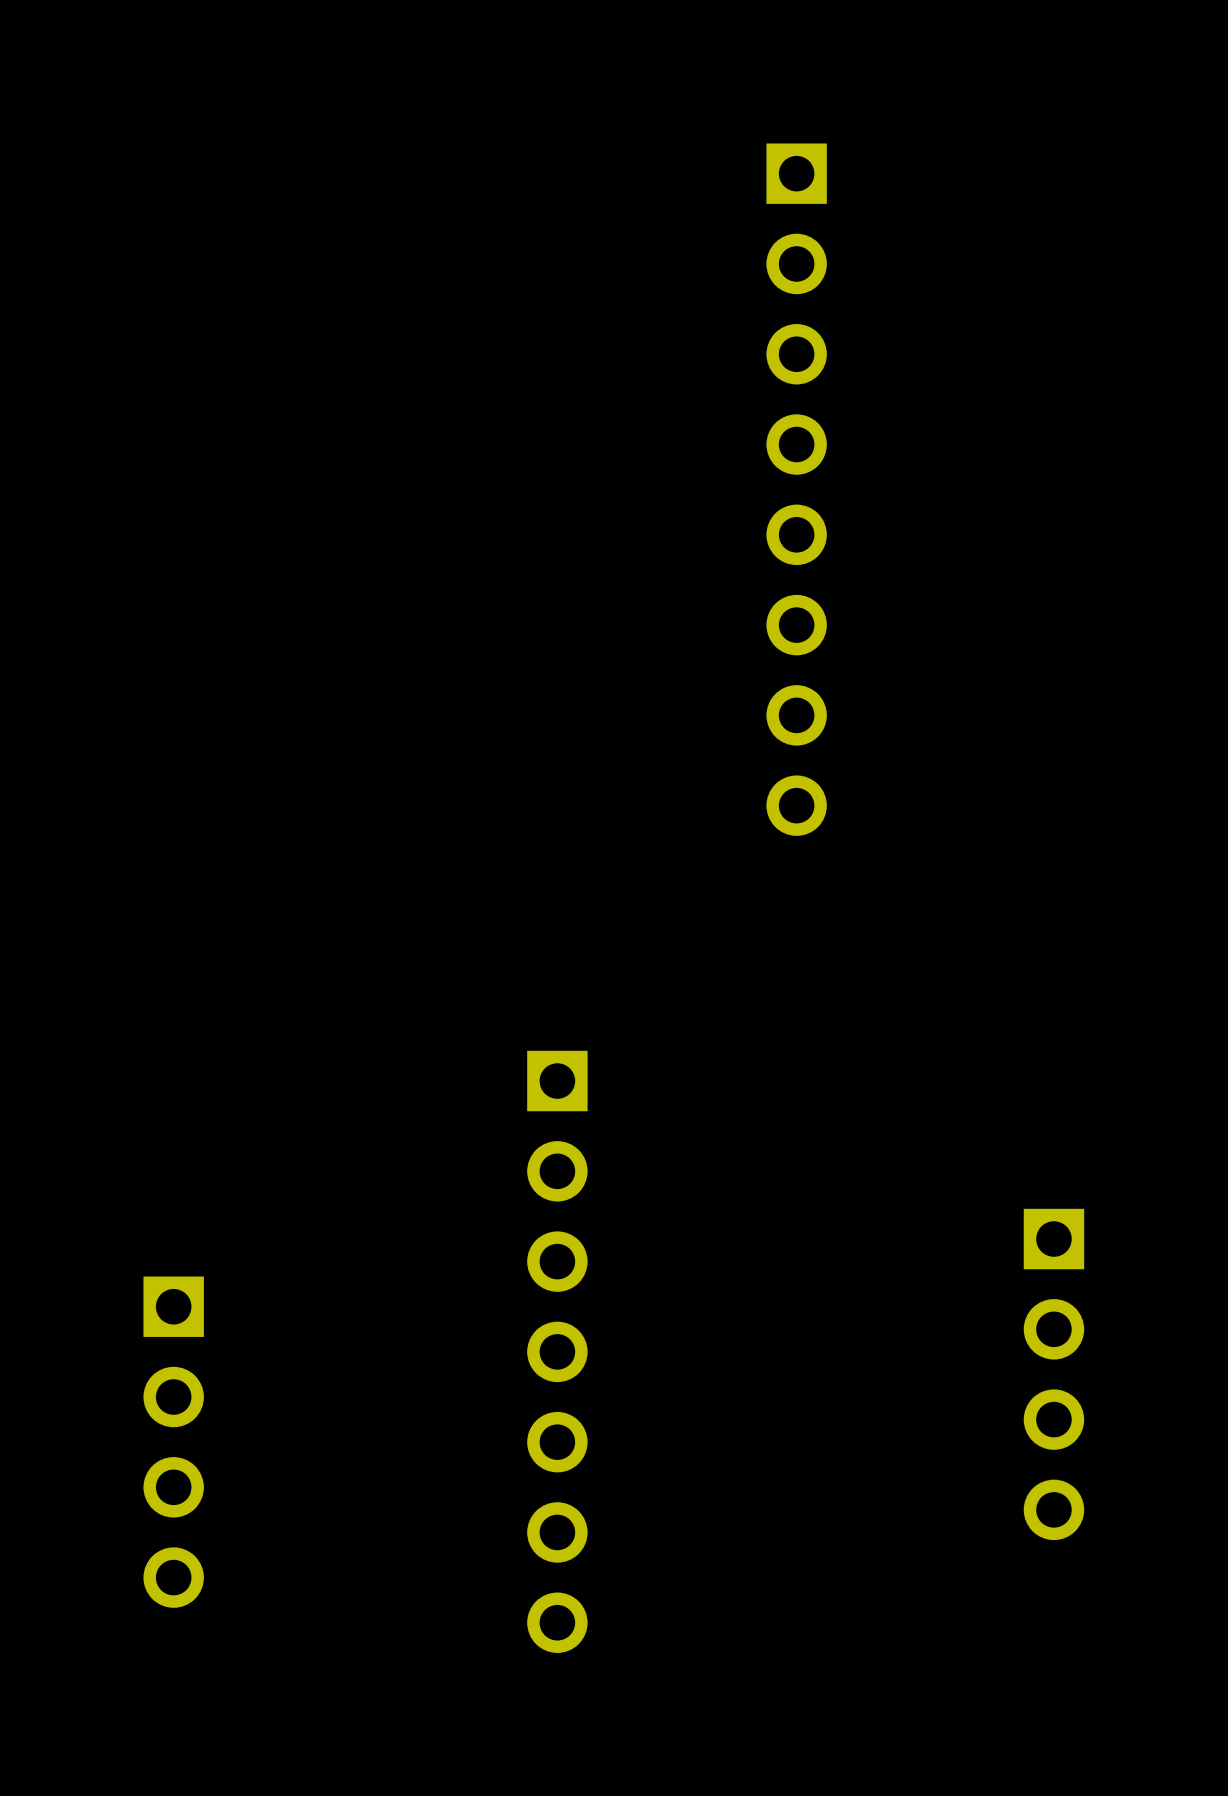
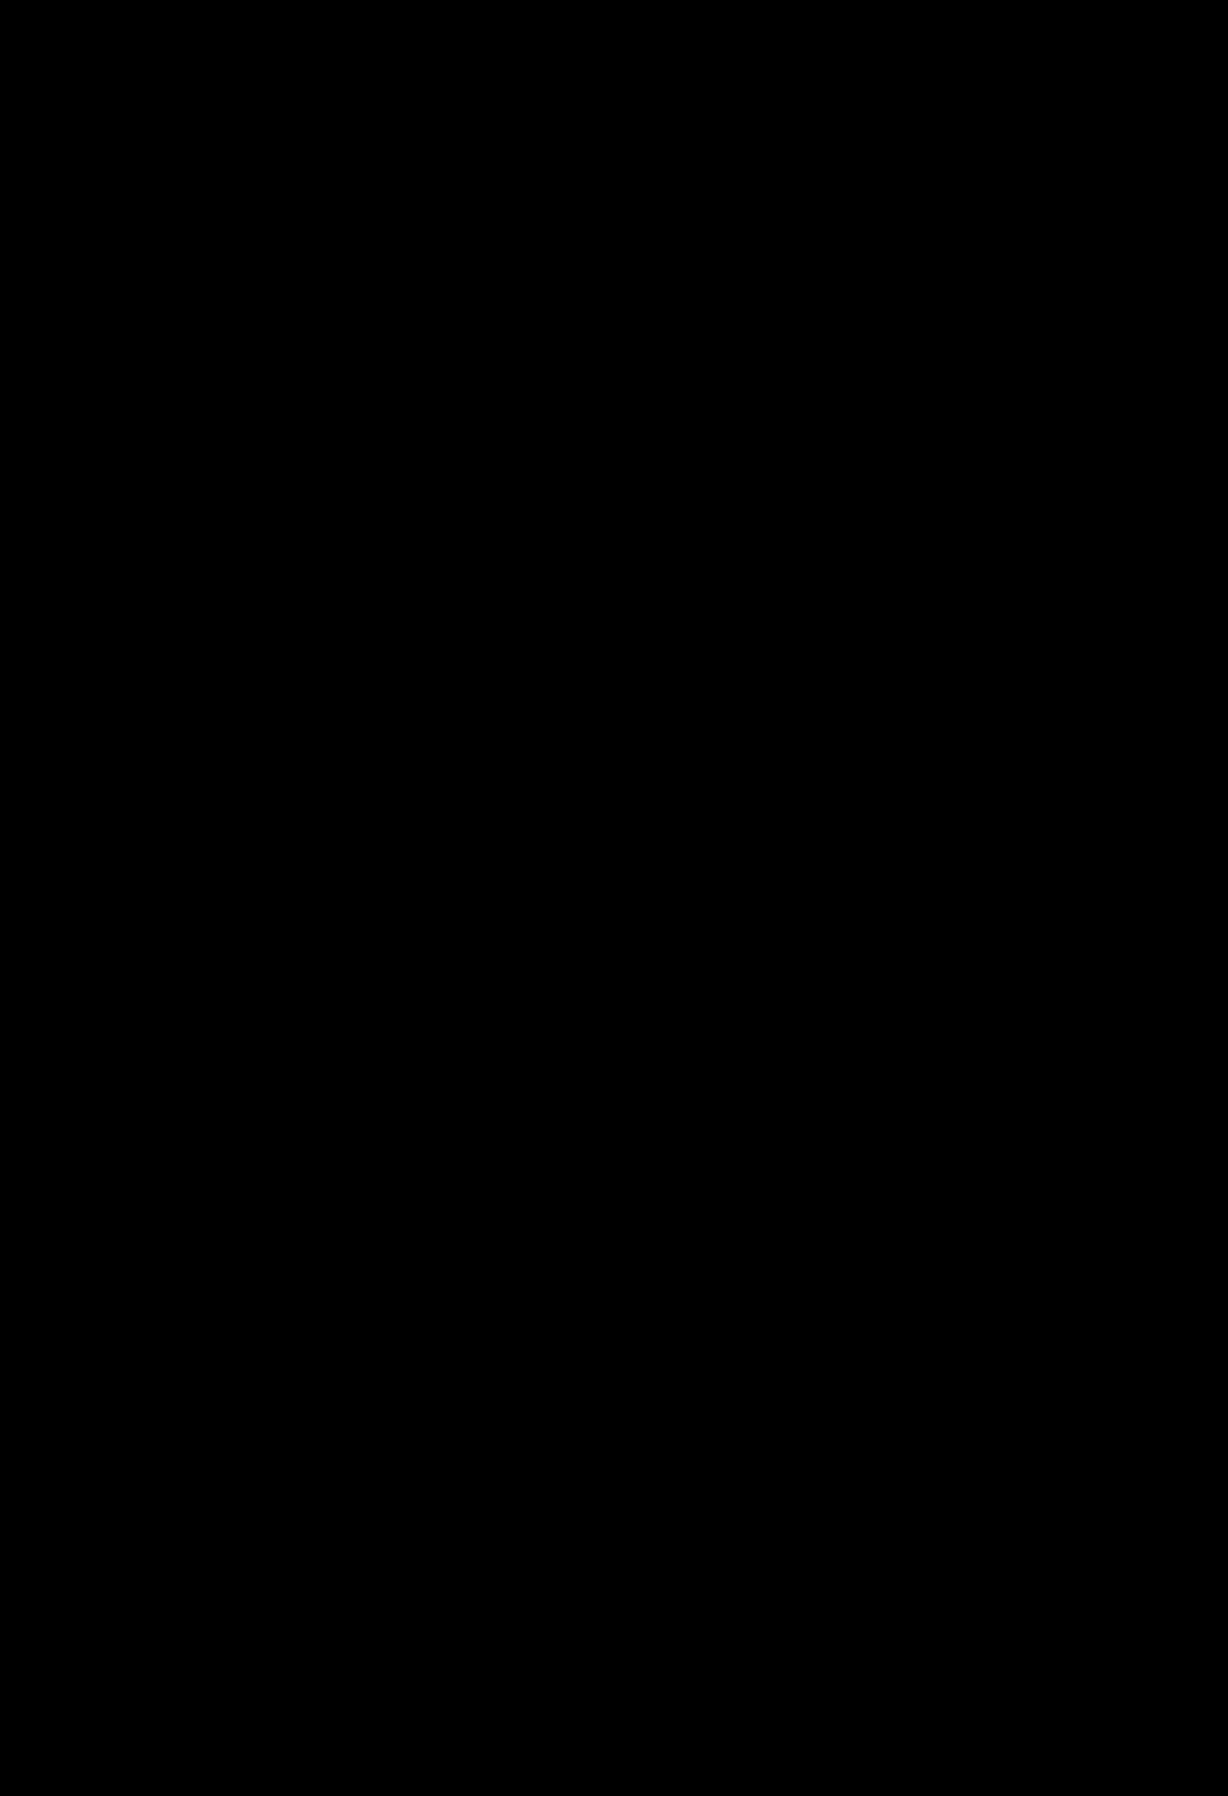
part: (796, 489) -> none
part: (557, 1351) -> none
part: (1053, 1374) -> none
part: (173, 1442) -> none

